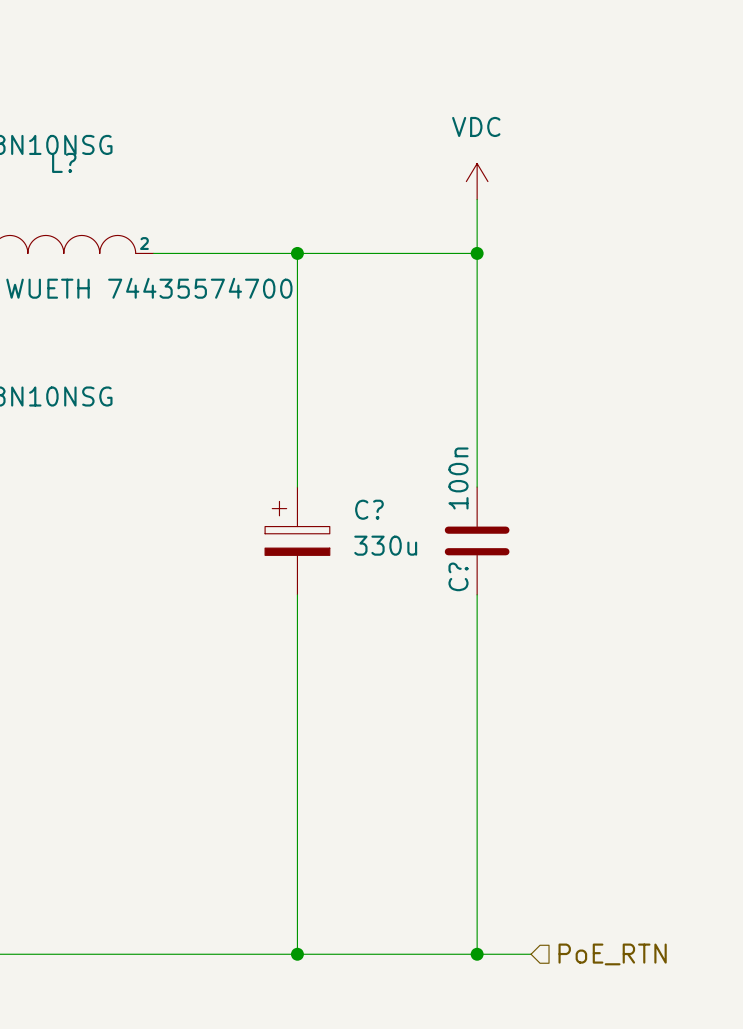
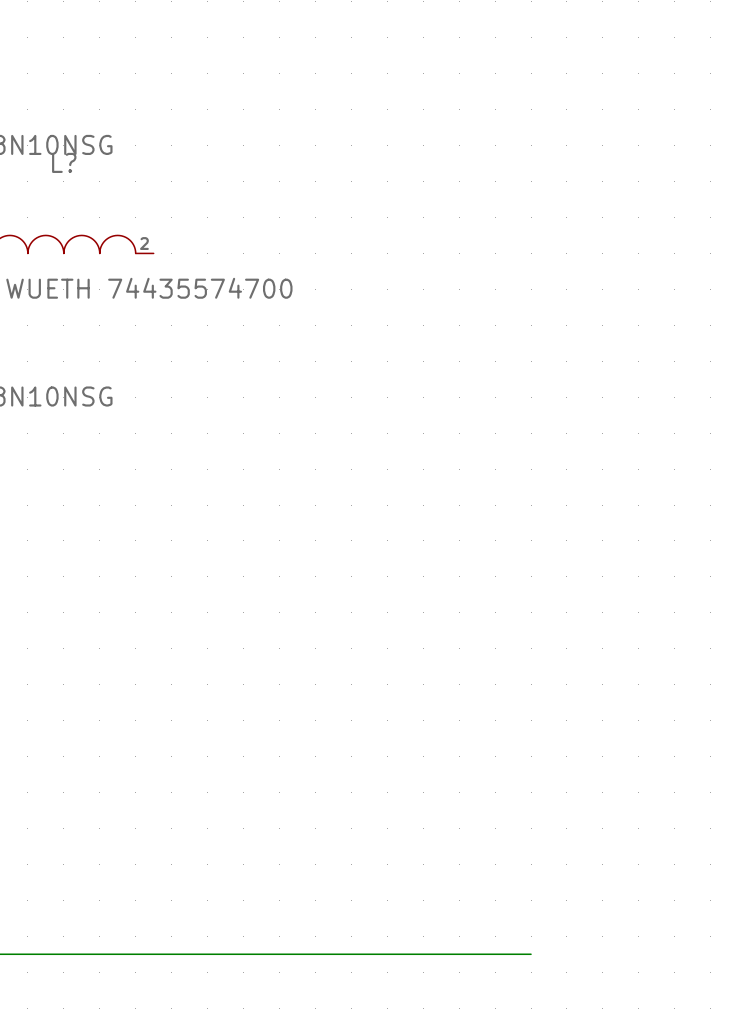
power symbol: VDC (477, 181) -> none
wire: (477, 199) (477, 487) -> none
wire: (153, 253) (477, 253) -> none
wire: (297, 253) (297, 487) -> none
junction: (297, 253) -> none
junction: (477, 253) -> none
C?: 330u (297, 540) -> none
C?: 100n (477, 540) -> none
wire: (297, 594) (297, 954) -> none
wire: (477, 594) (477, 954) -> none
junction: (297, 954) -> none
junction: (477, 954) -> none
hierarchical label: PoE_RTN (612, 954) -> none

